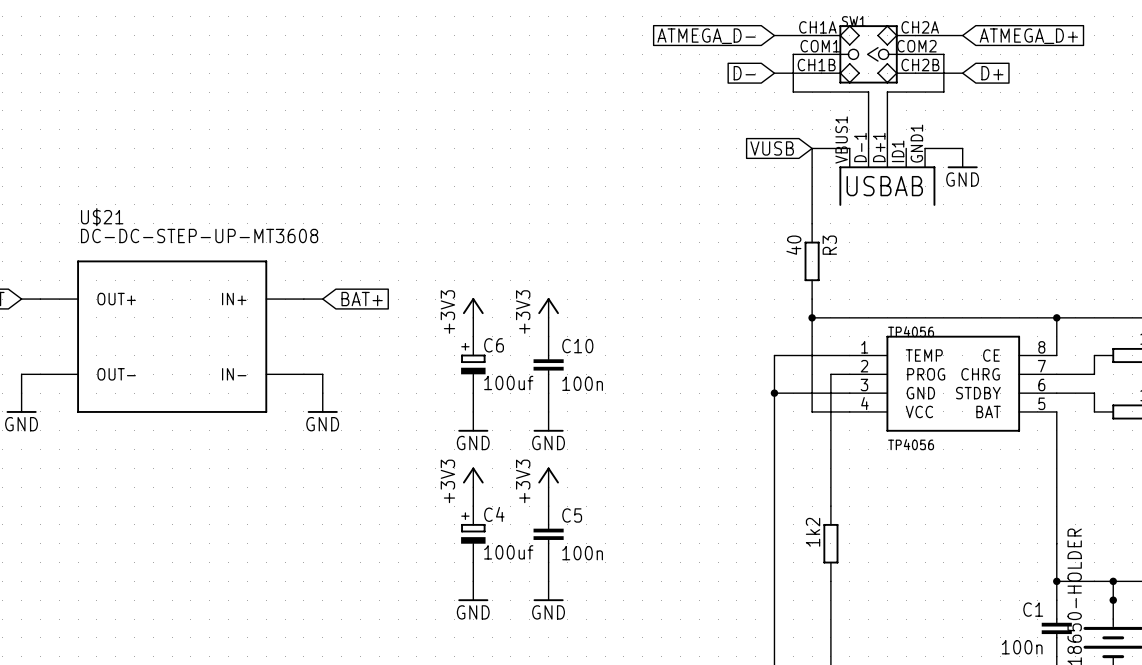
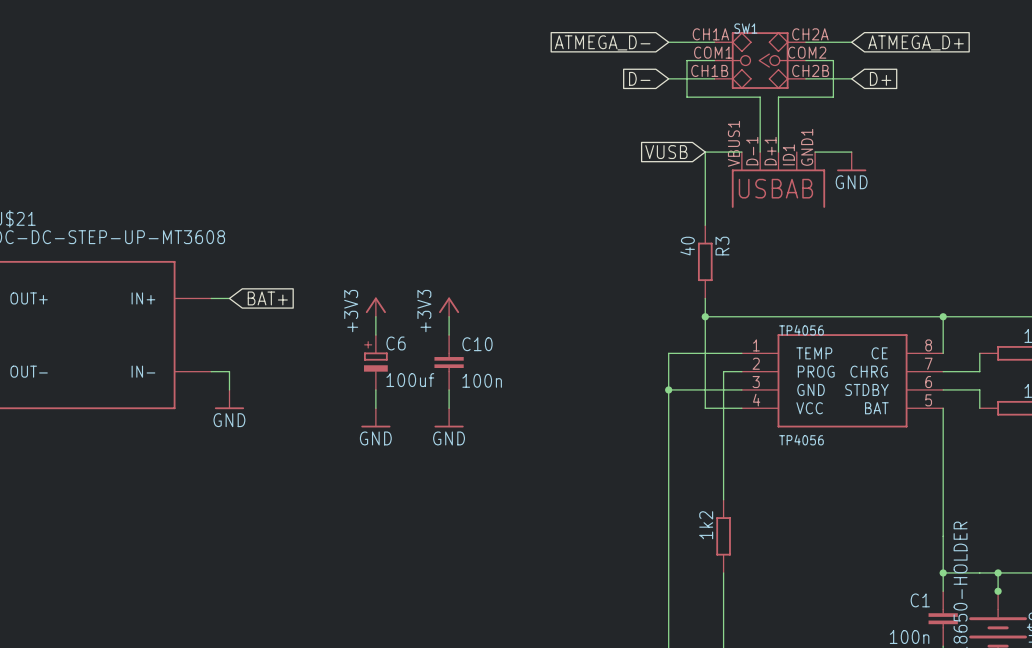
power symbol: +3V3 (473, 477) -> none
power symbol: +3V3 (548, 477) -> none
wire: (473, 487) (473, 506) -> none
wire: (548, 487) (548, 506) -> none
C4: 100uf (473, 534) -> none
C5: 100n (548, 534) -> none
wire: (473, 562) (473, 581) -> none
wire: (548, 562) (548, 581) -> none
power symbol: GND (473, 591) -> none
power symbol: GND (548, 591) -> none

